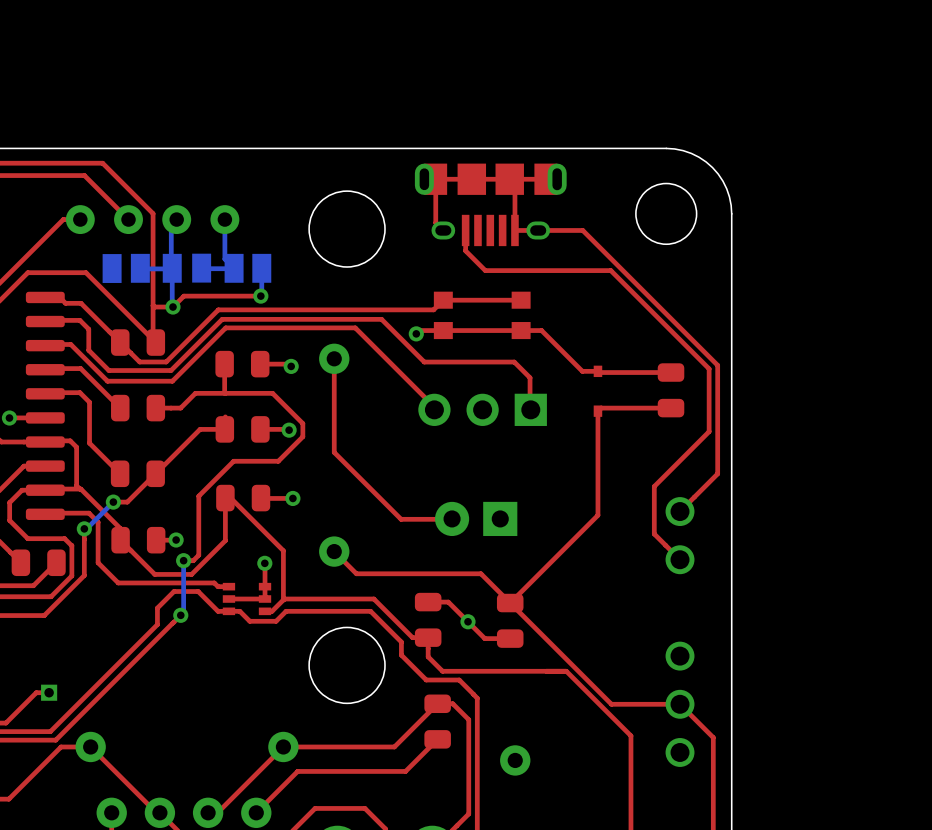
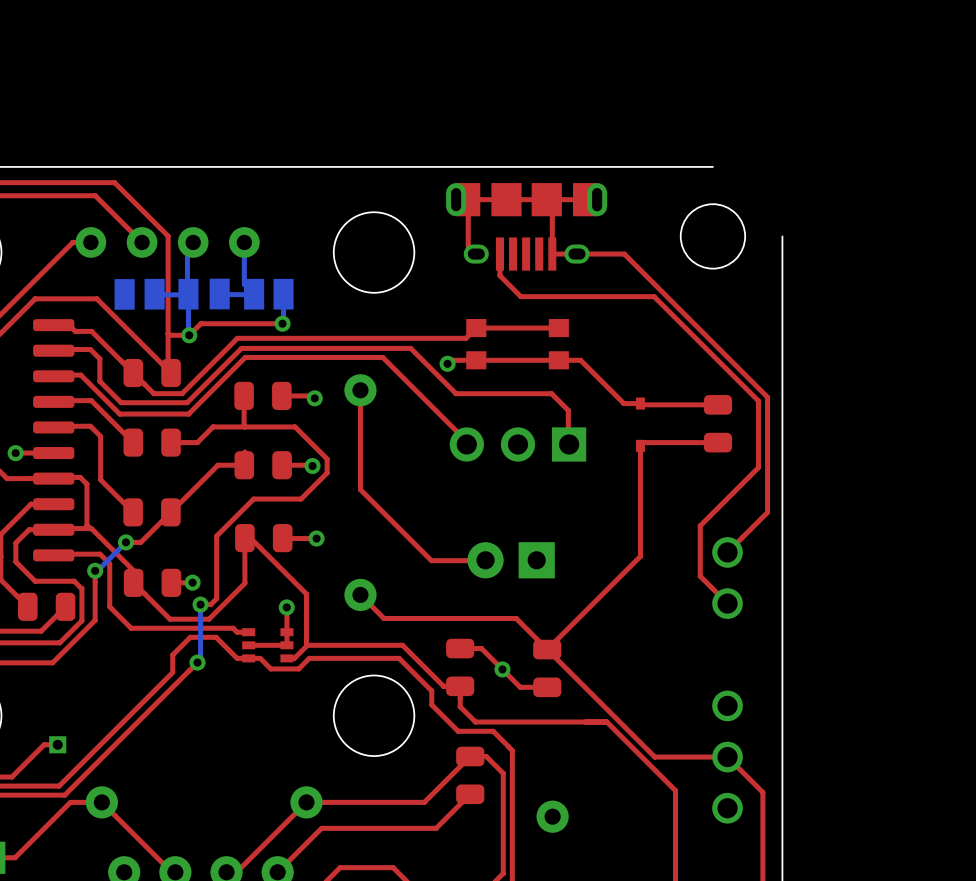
board edge: (666, 148) (691, 153) (712, 167) (726, 188) (731, 213) -> none

